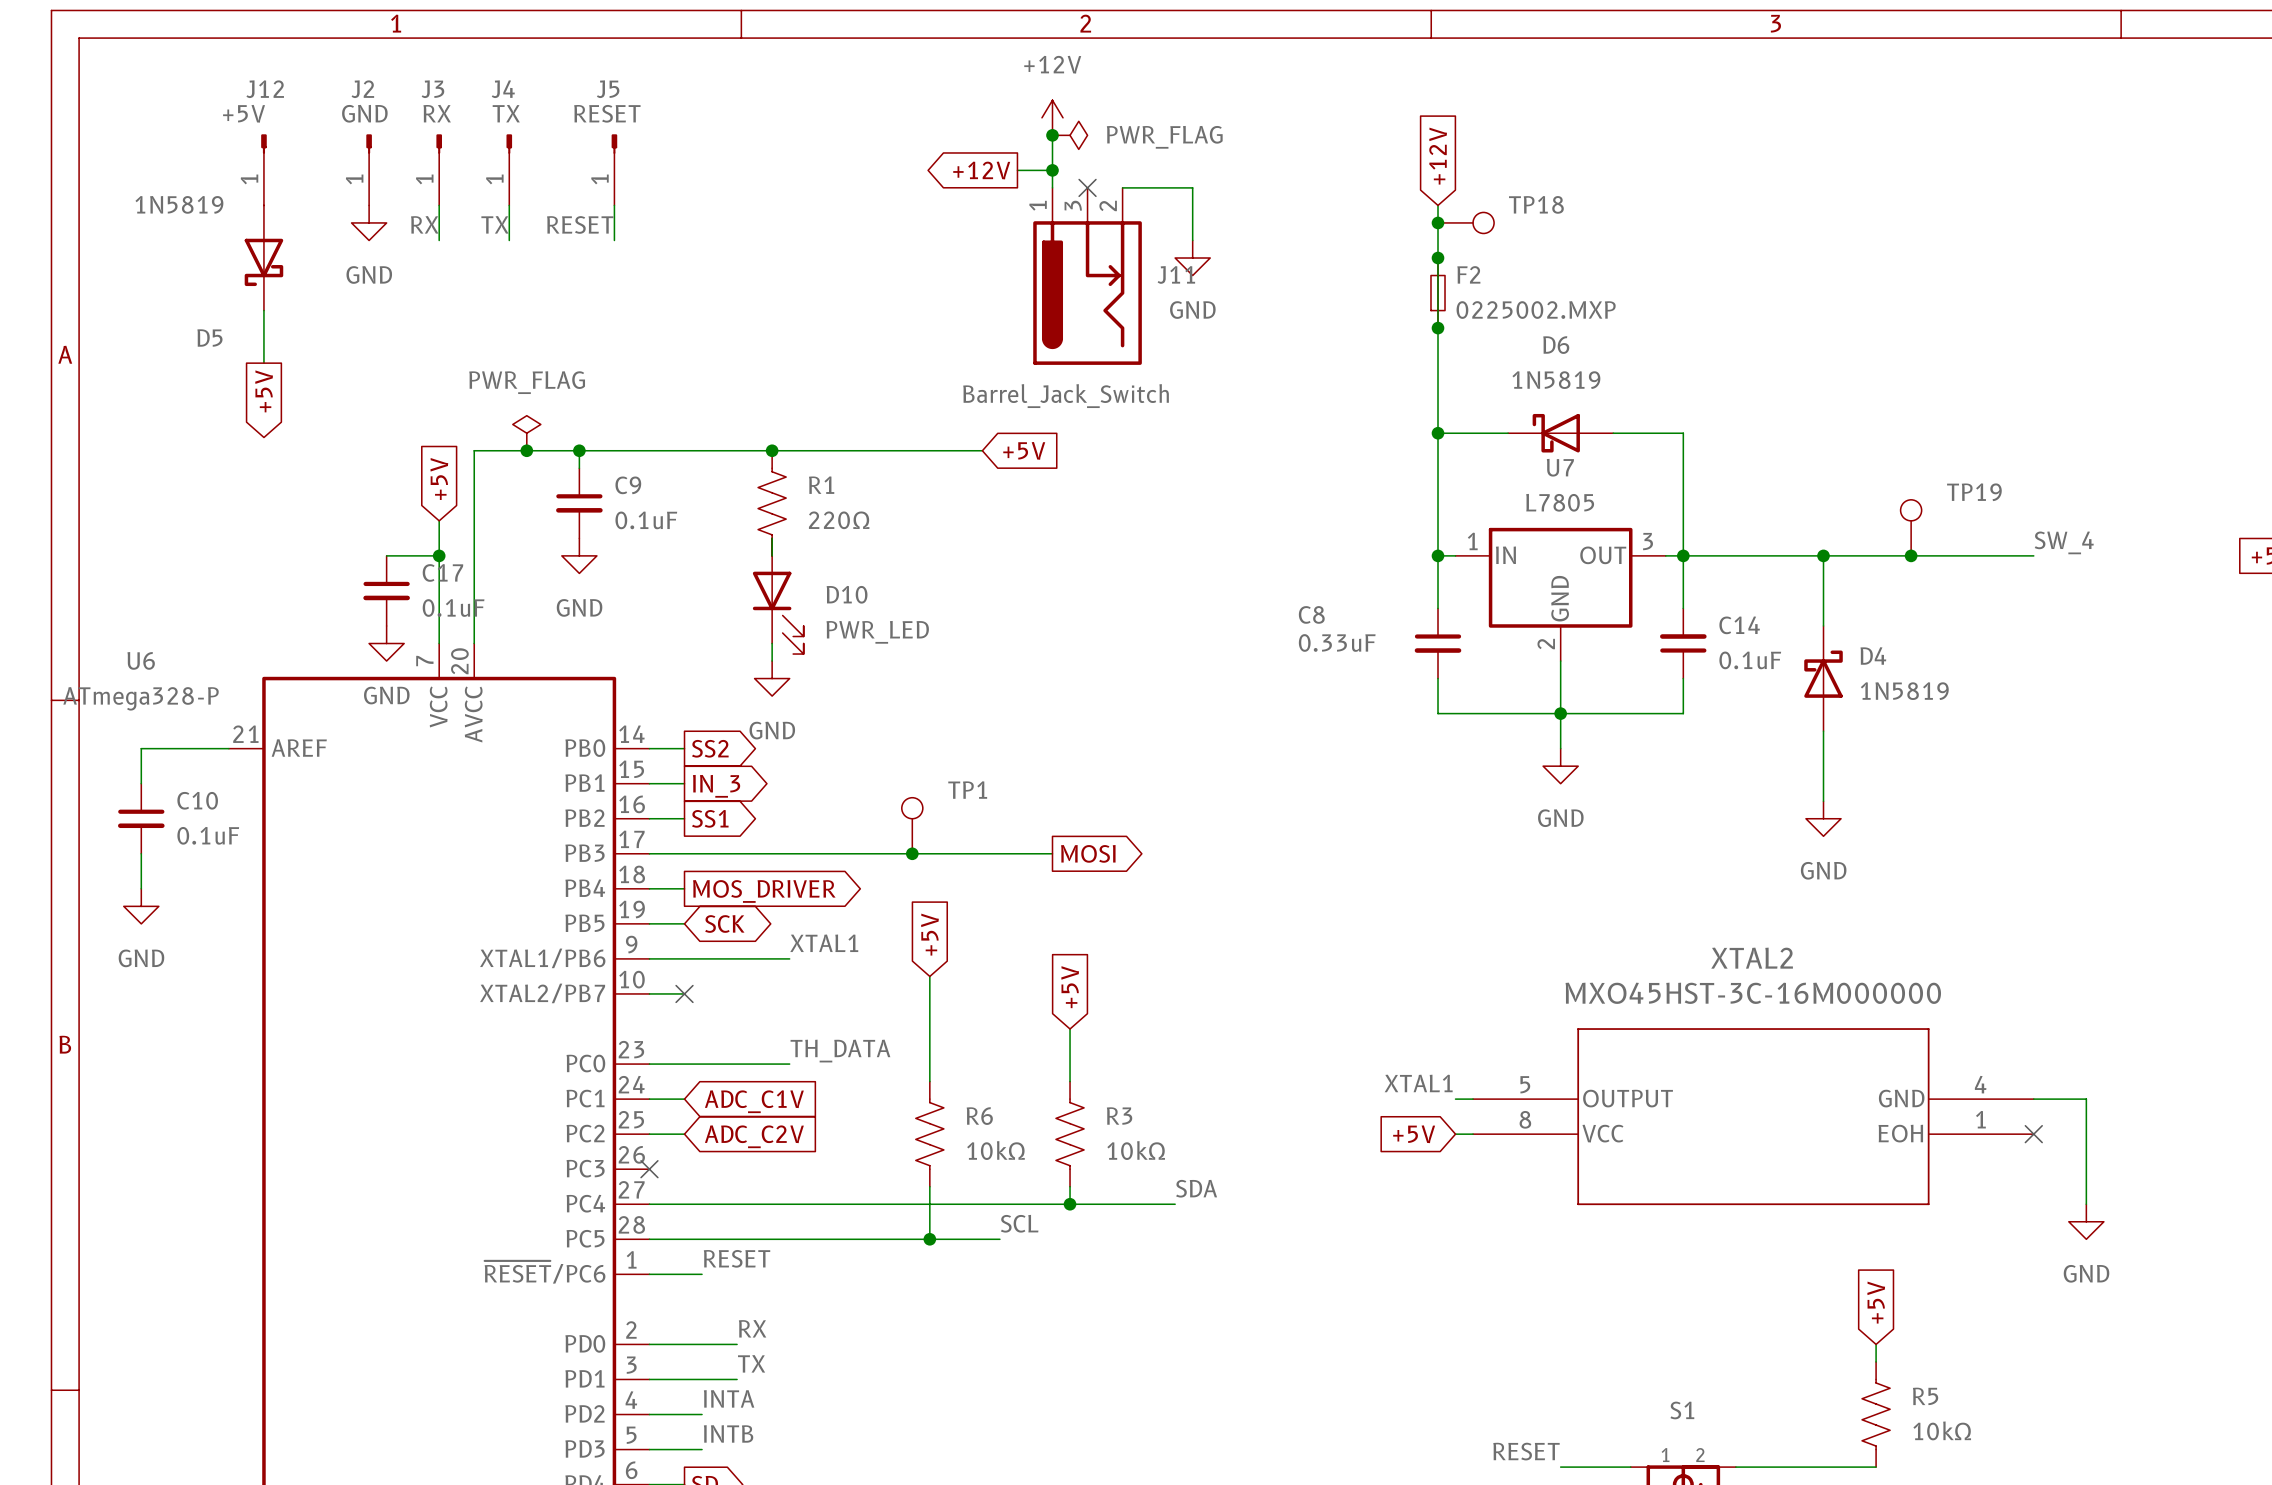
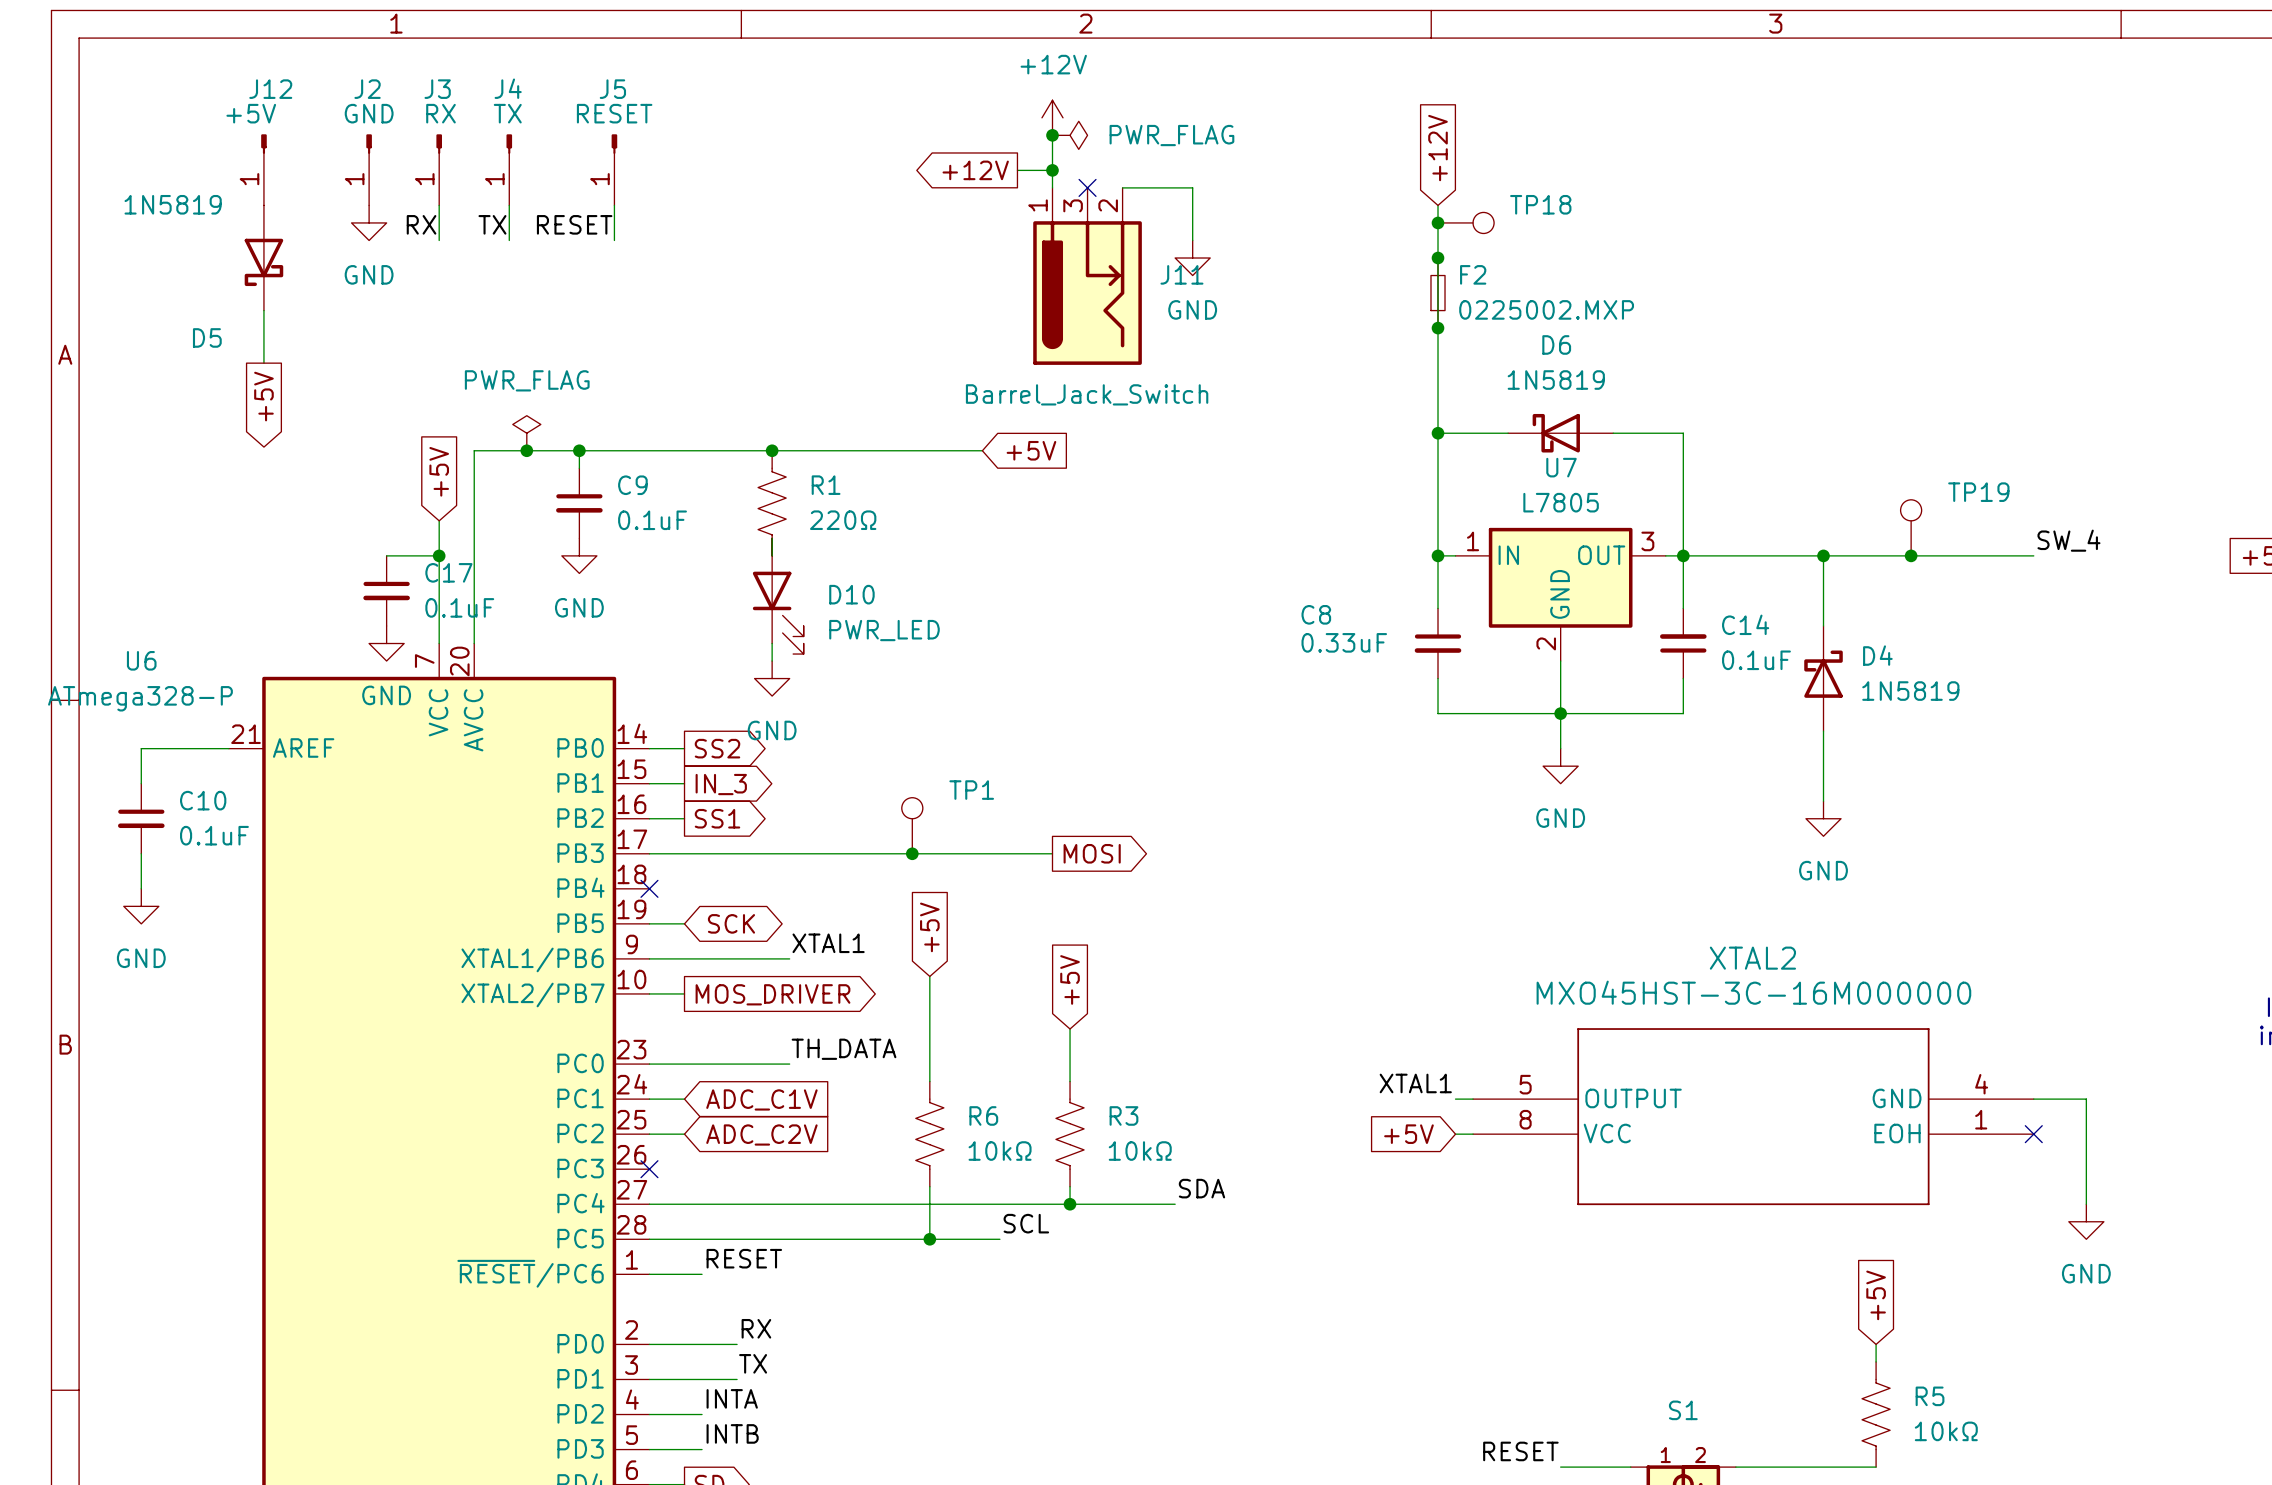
wire: (649, 888) (684, 888) -> none
no-connect mark: none -> (649, 888)
global label position: MOS_DRIVER (764, 891) -> MOS_DRIVER (772, 994)
no-connect mark: (684, 993) -> none

